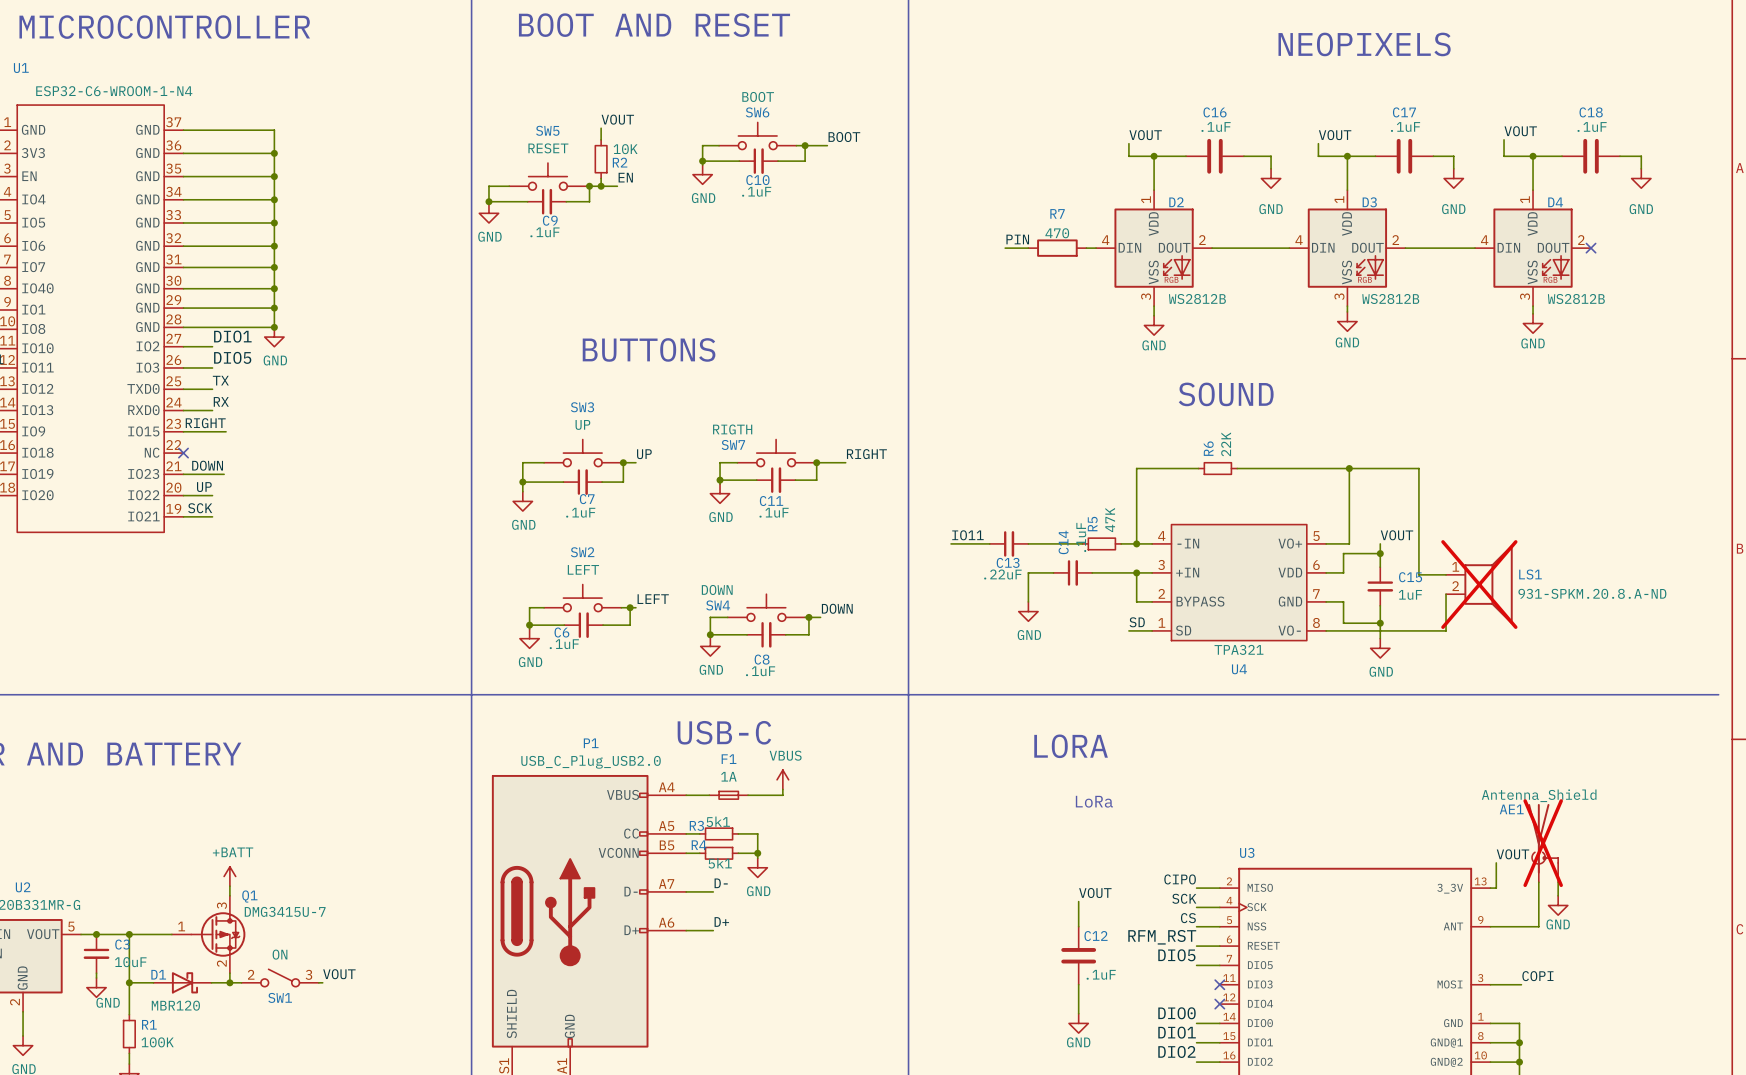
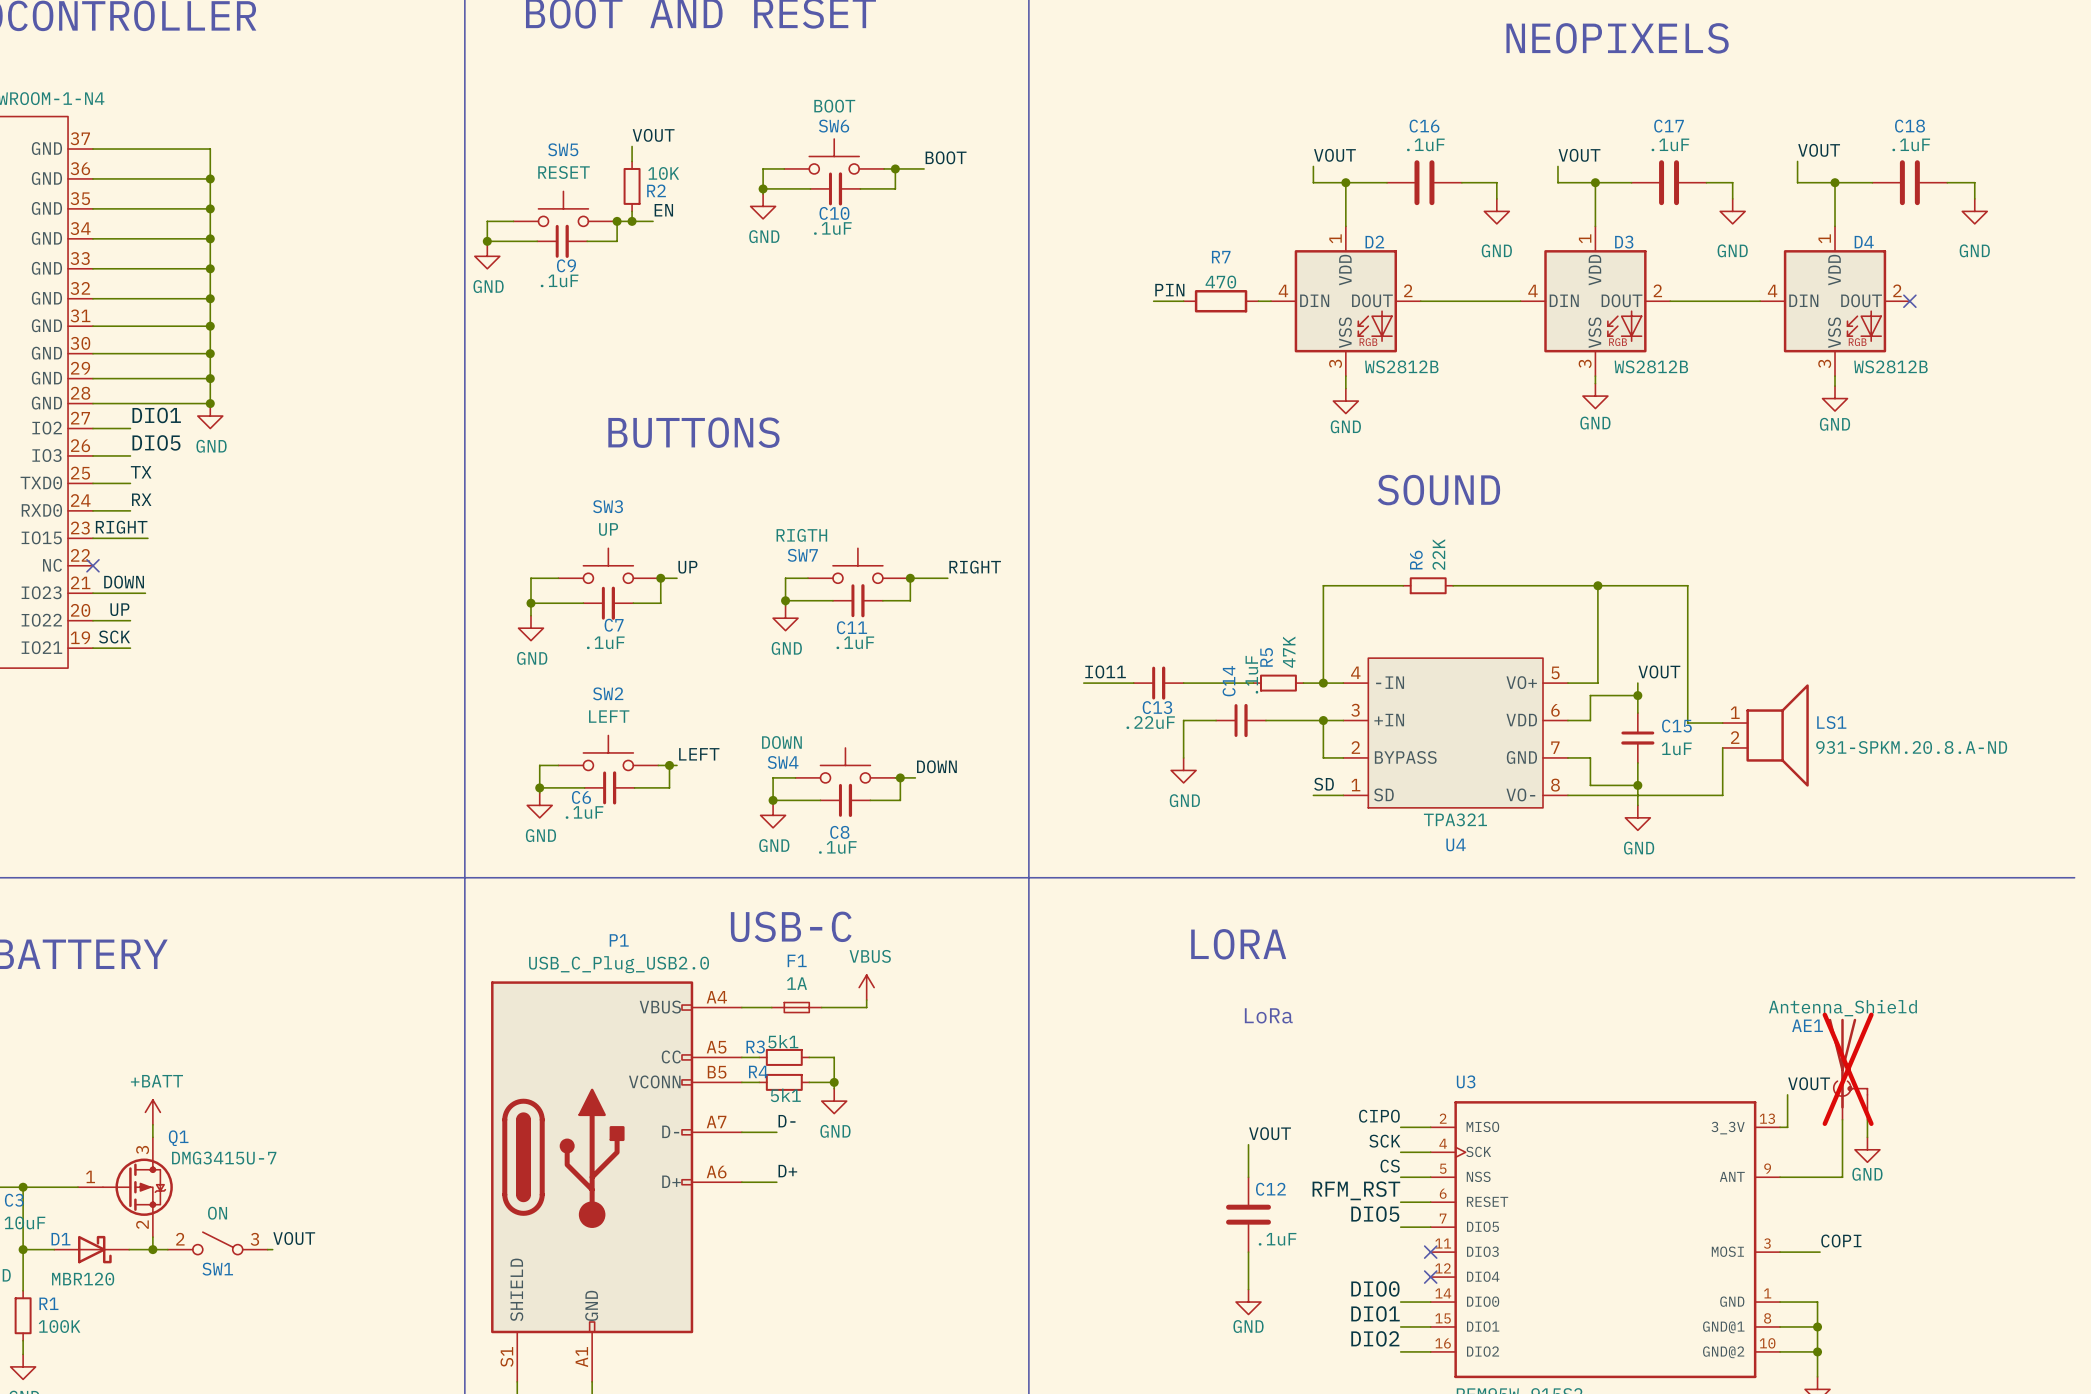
LS1 do-not-place cross: (1479, 584) -> none

